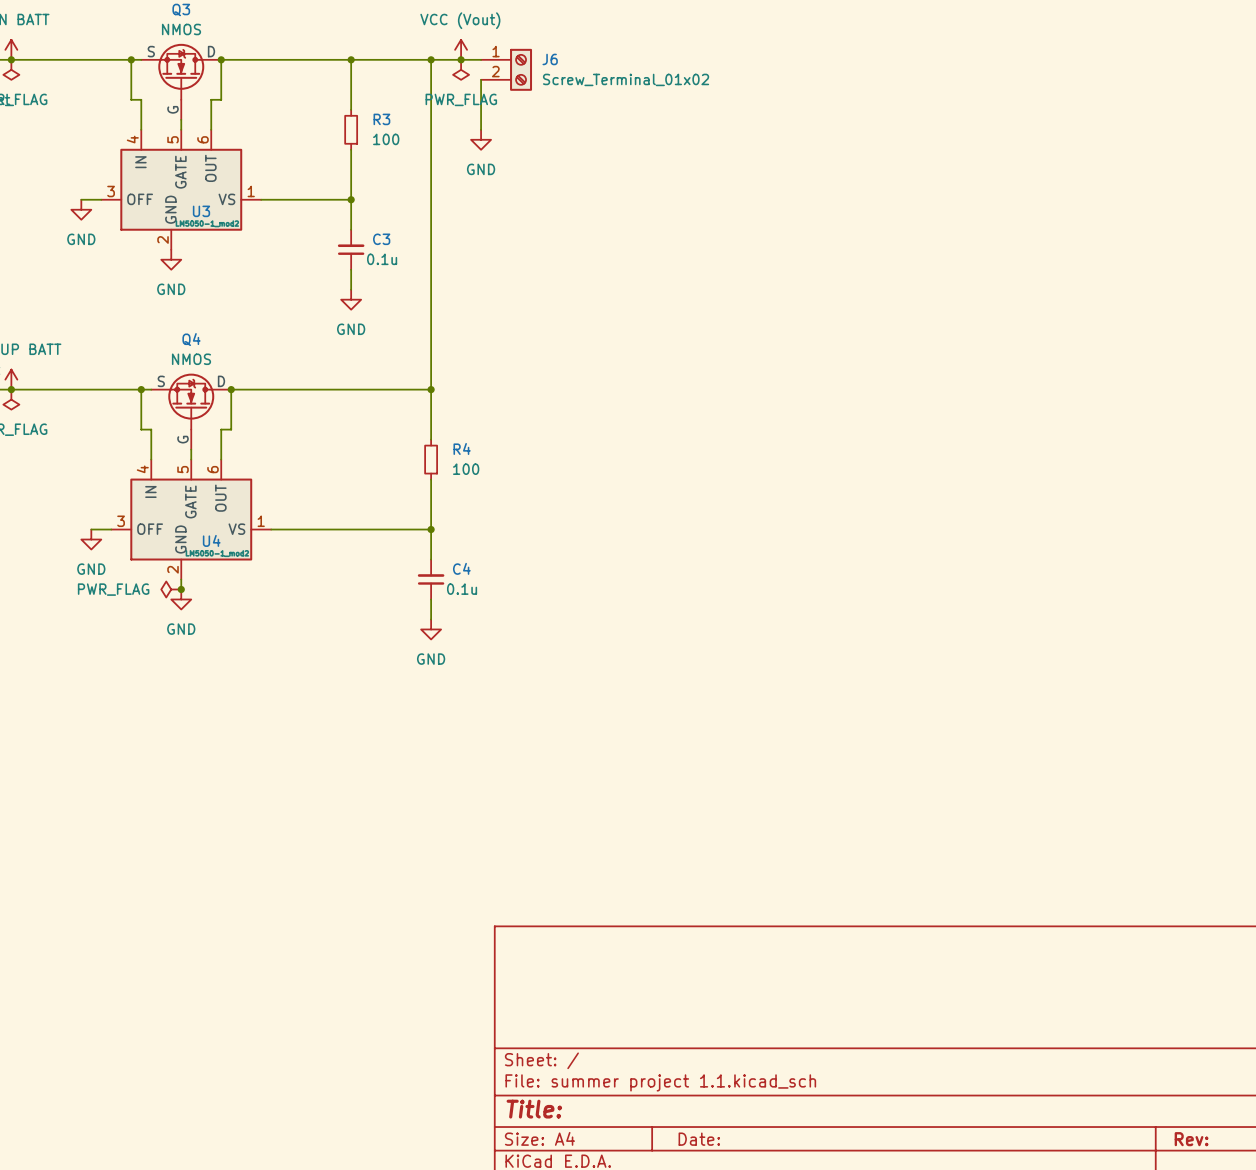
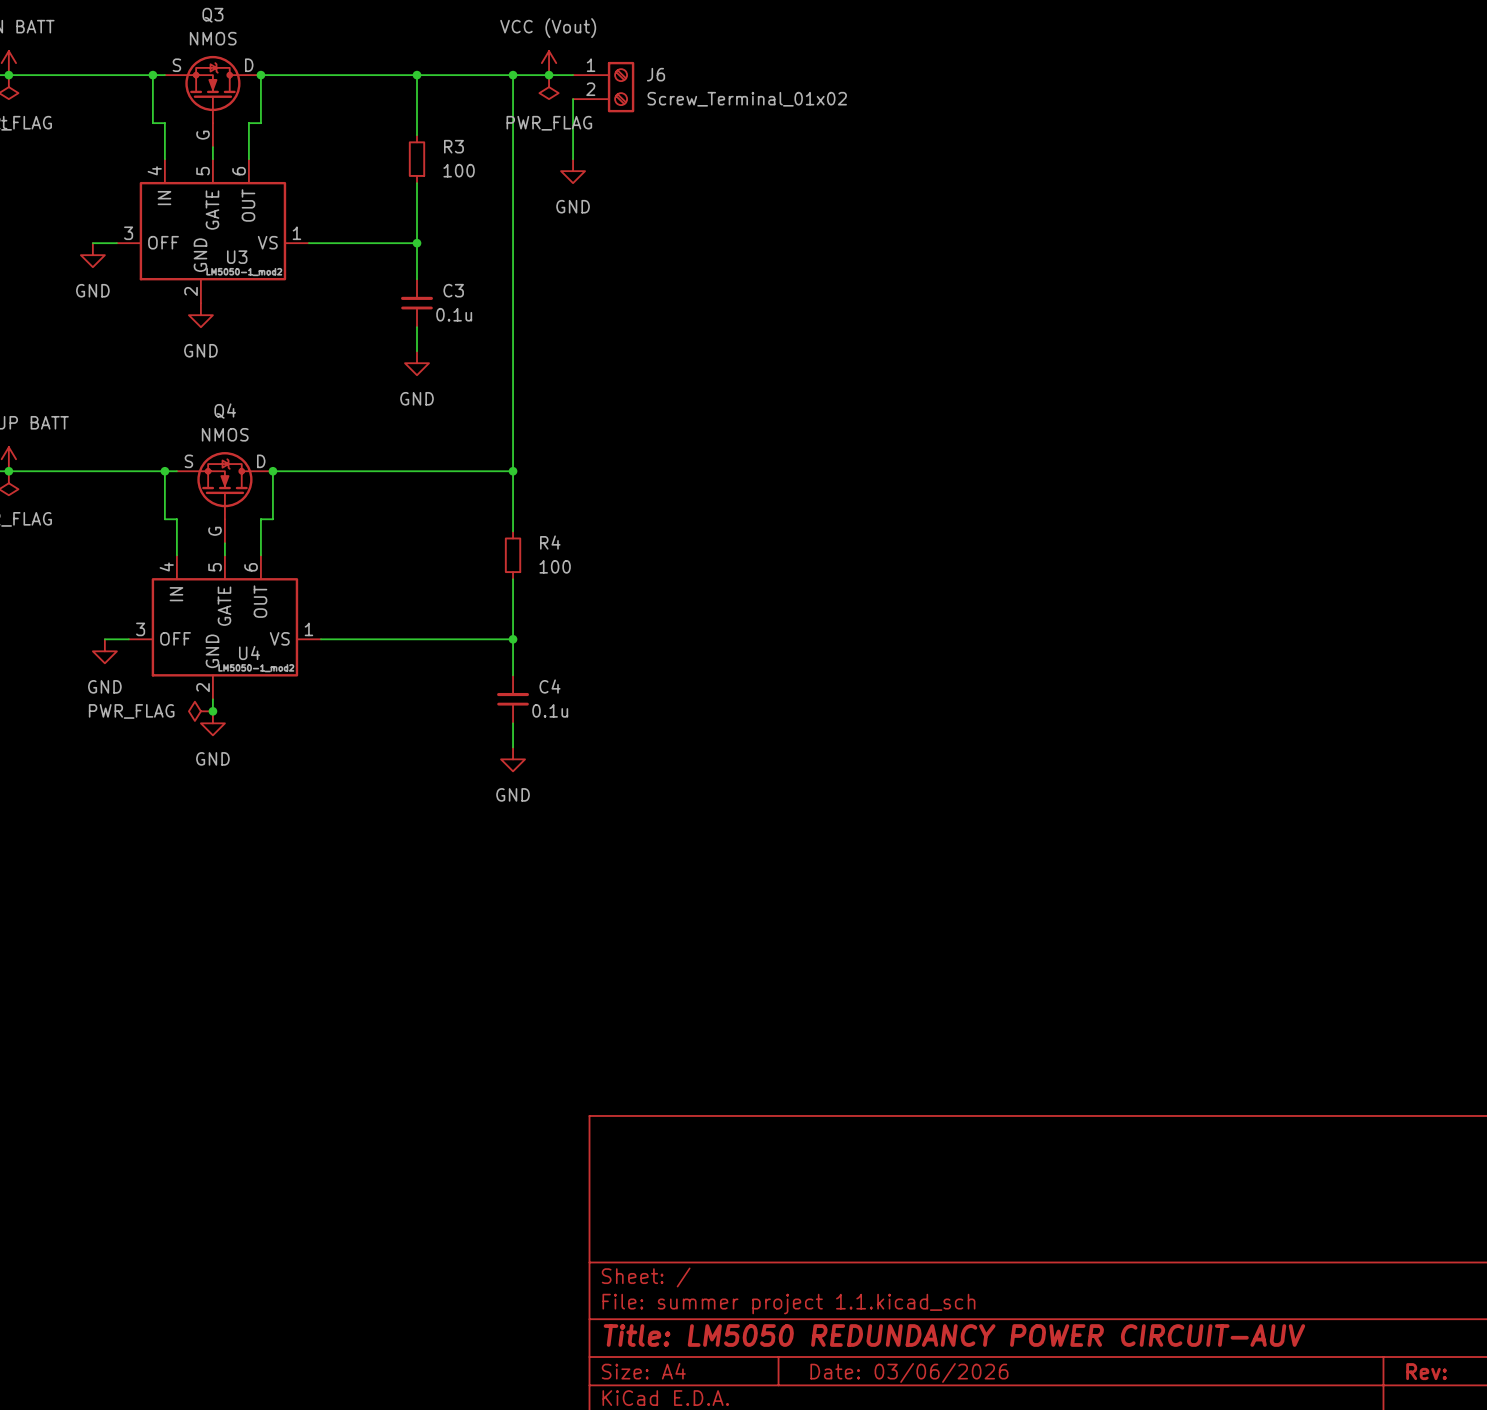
title block: Title: (534, 1109) -> Title: LM5050 REDUNDANCY POWER CIRCUIT-AUV (954, 1335)
title block: Date: (699, 1139) -> Date: 03/06/2026 (909, 1372)

